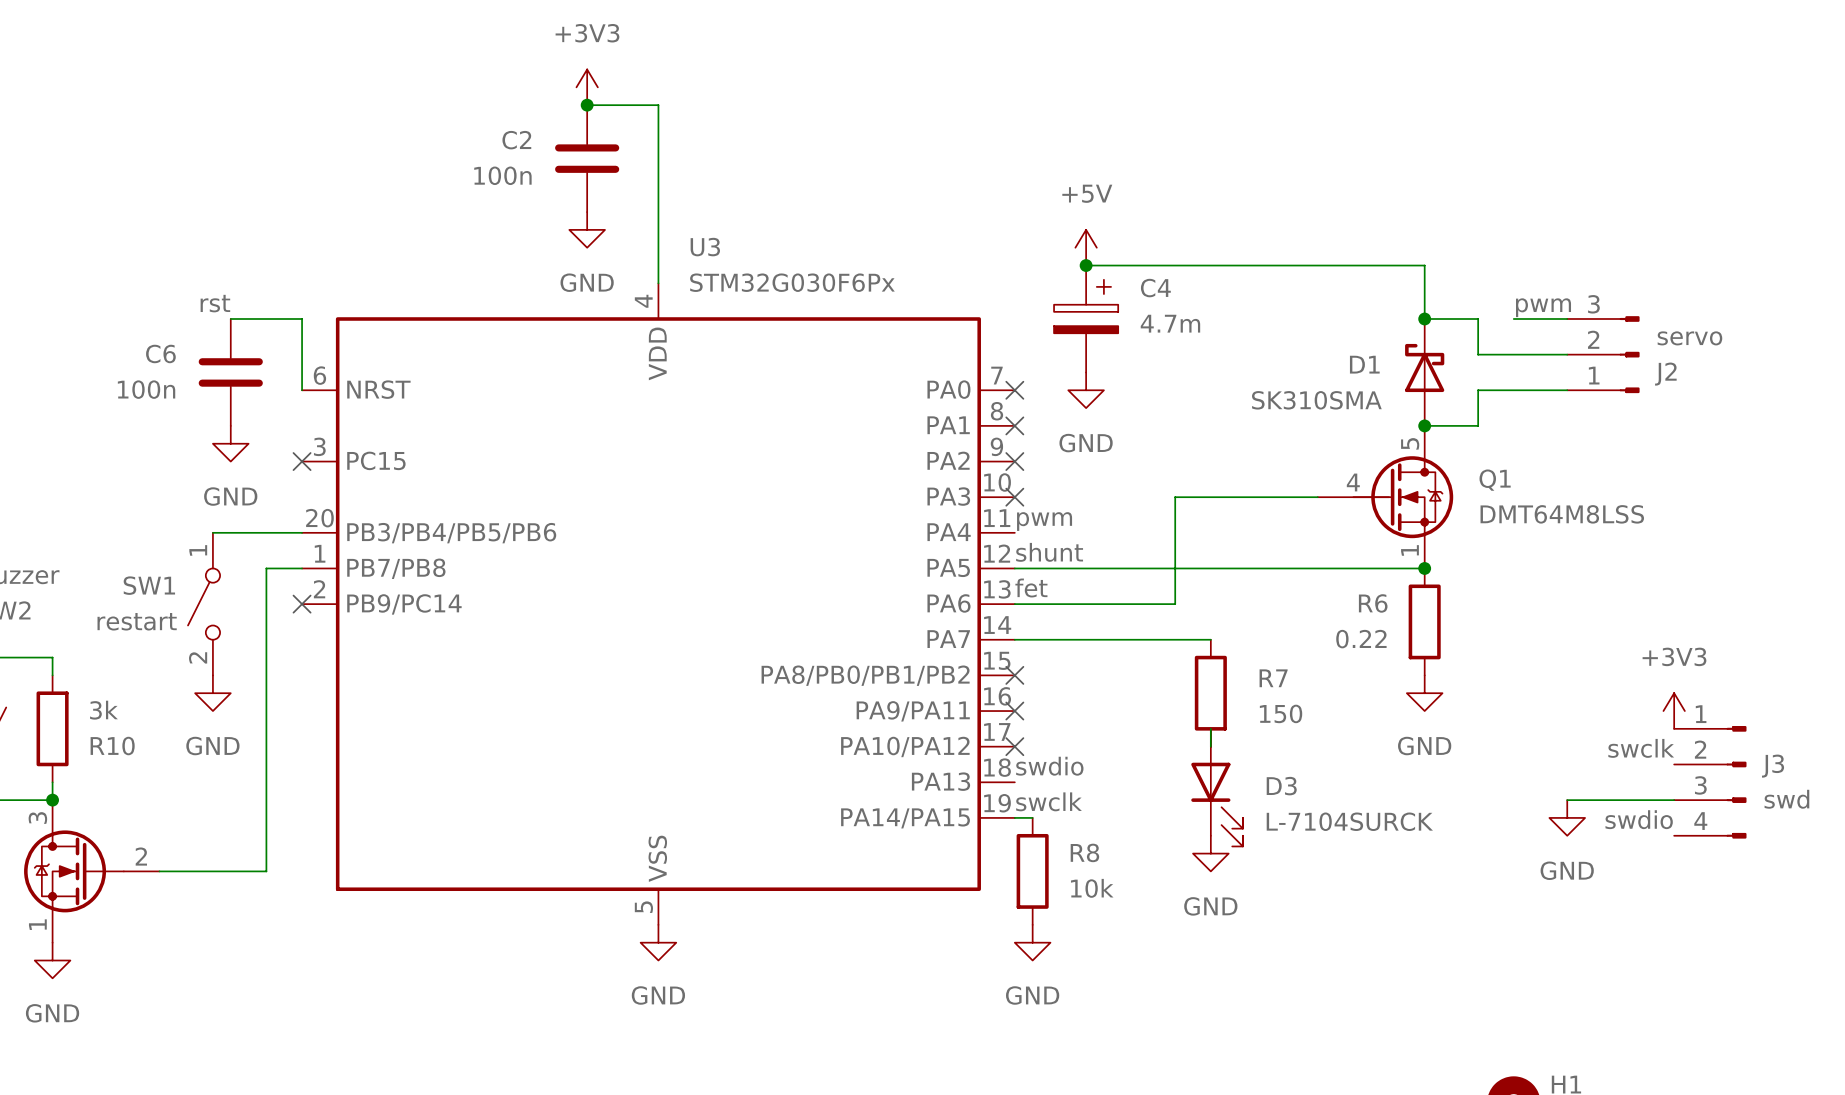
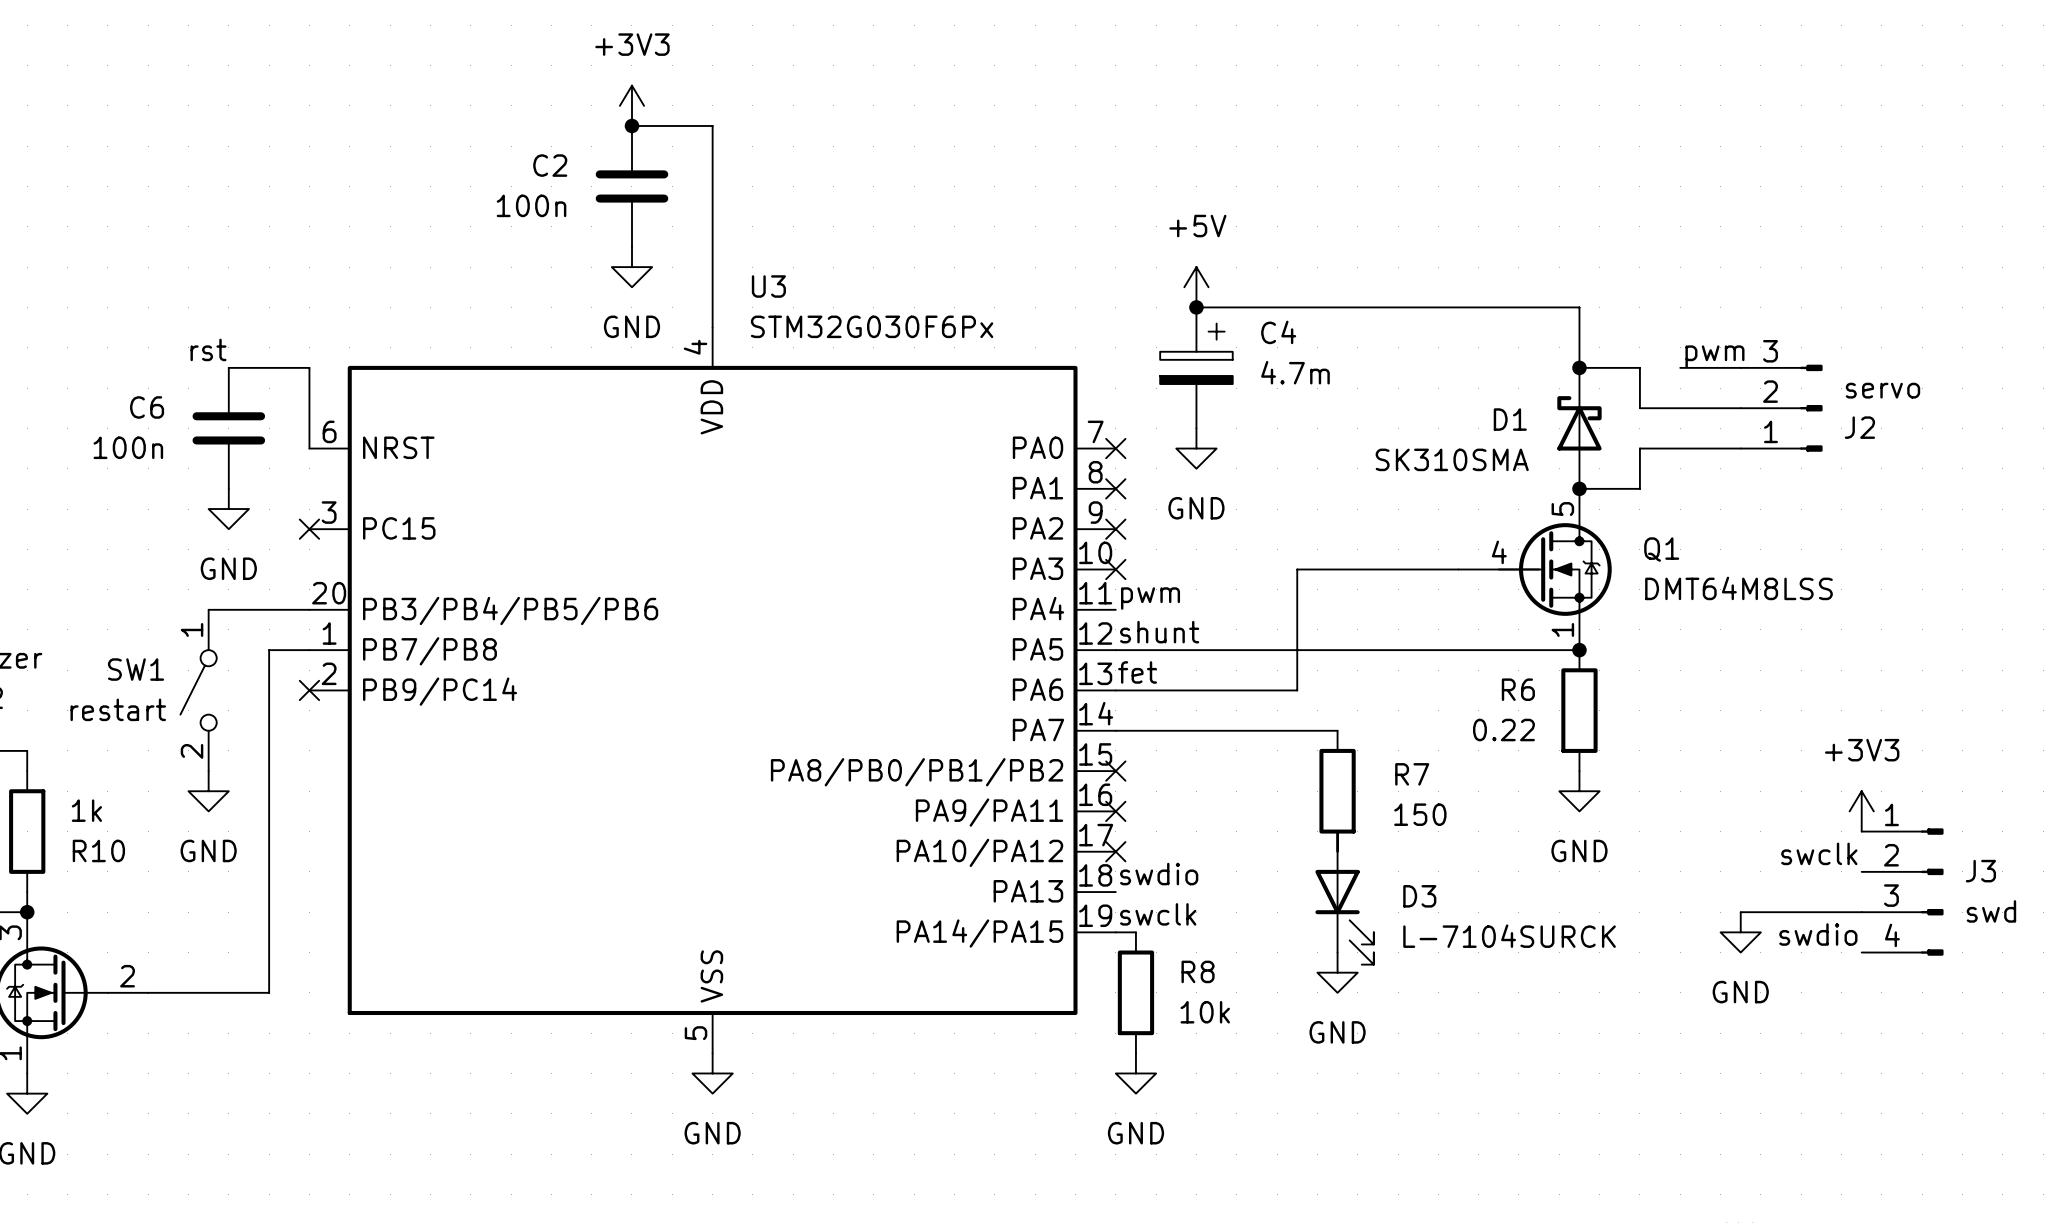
R10 value: 3k (103, 710) -> 1k (86, 810)

